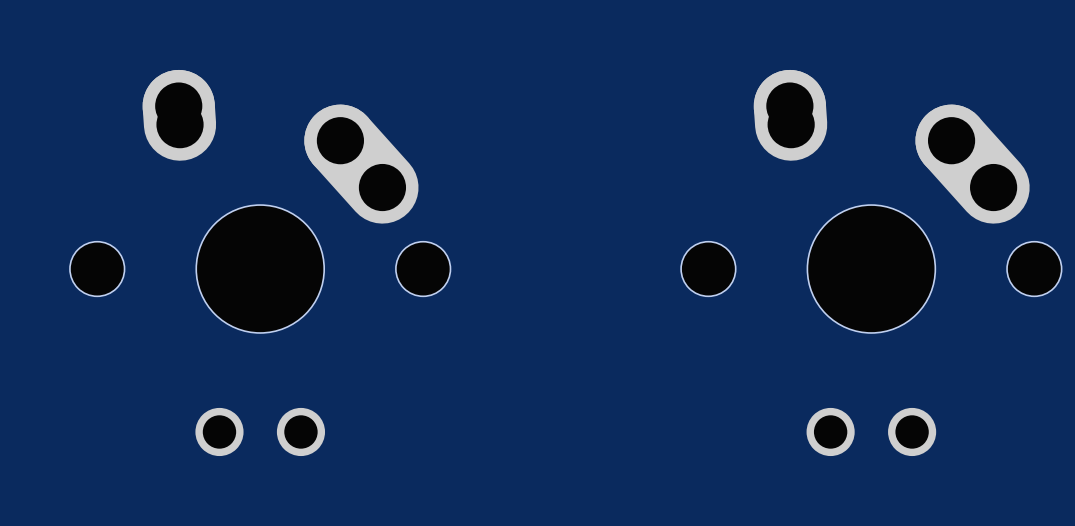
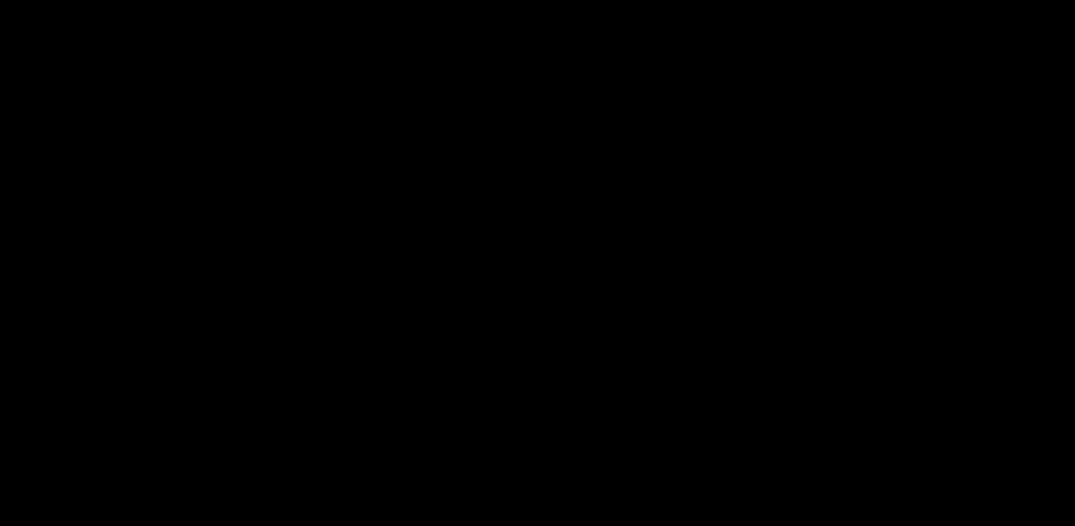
part: (260, 263) -> none
part: (871, 263) -> none

